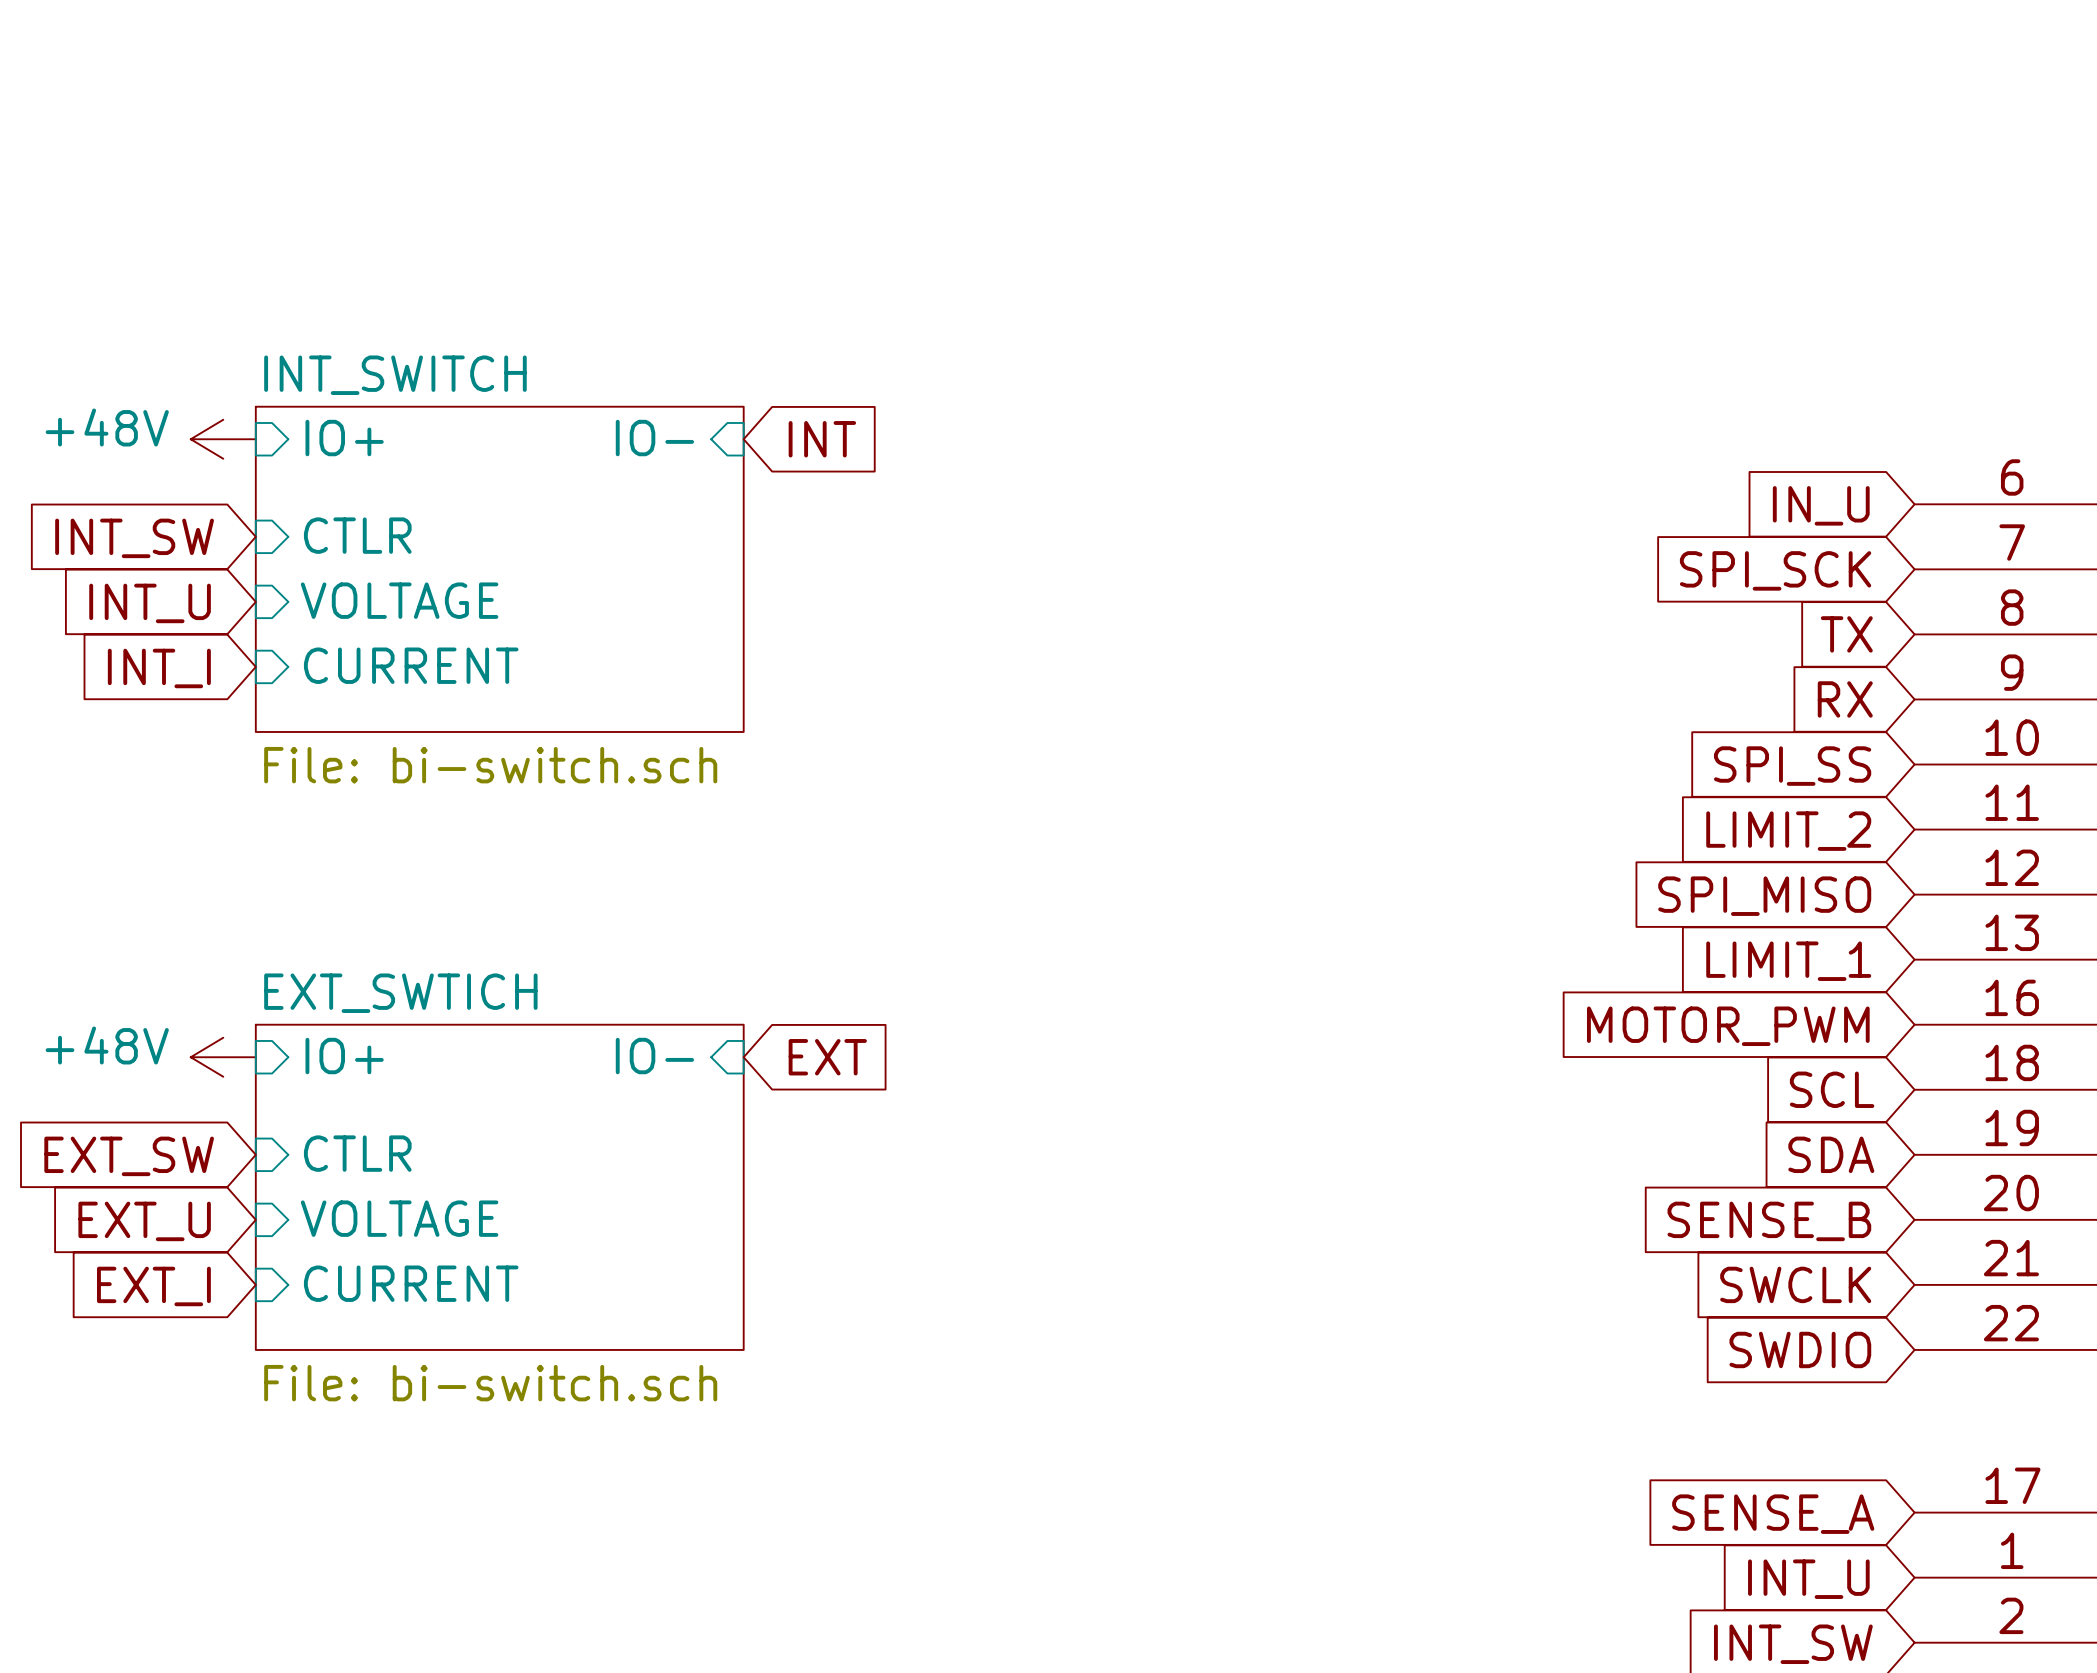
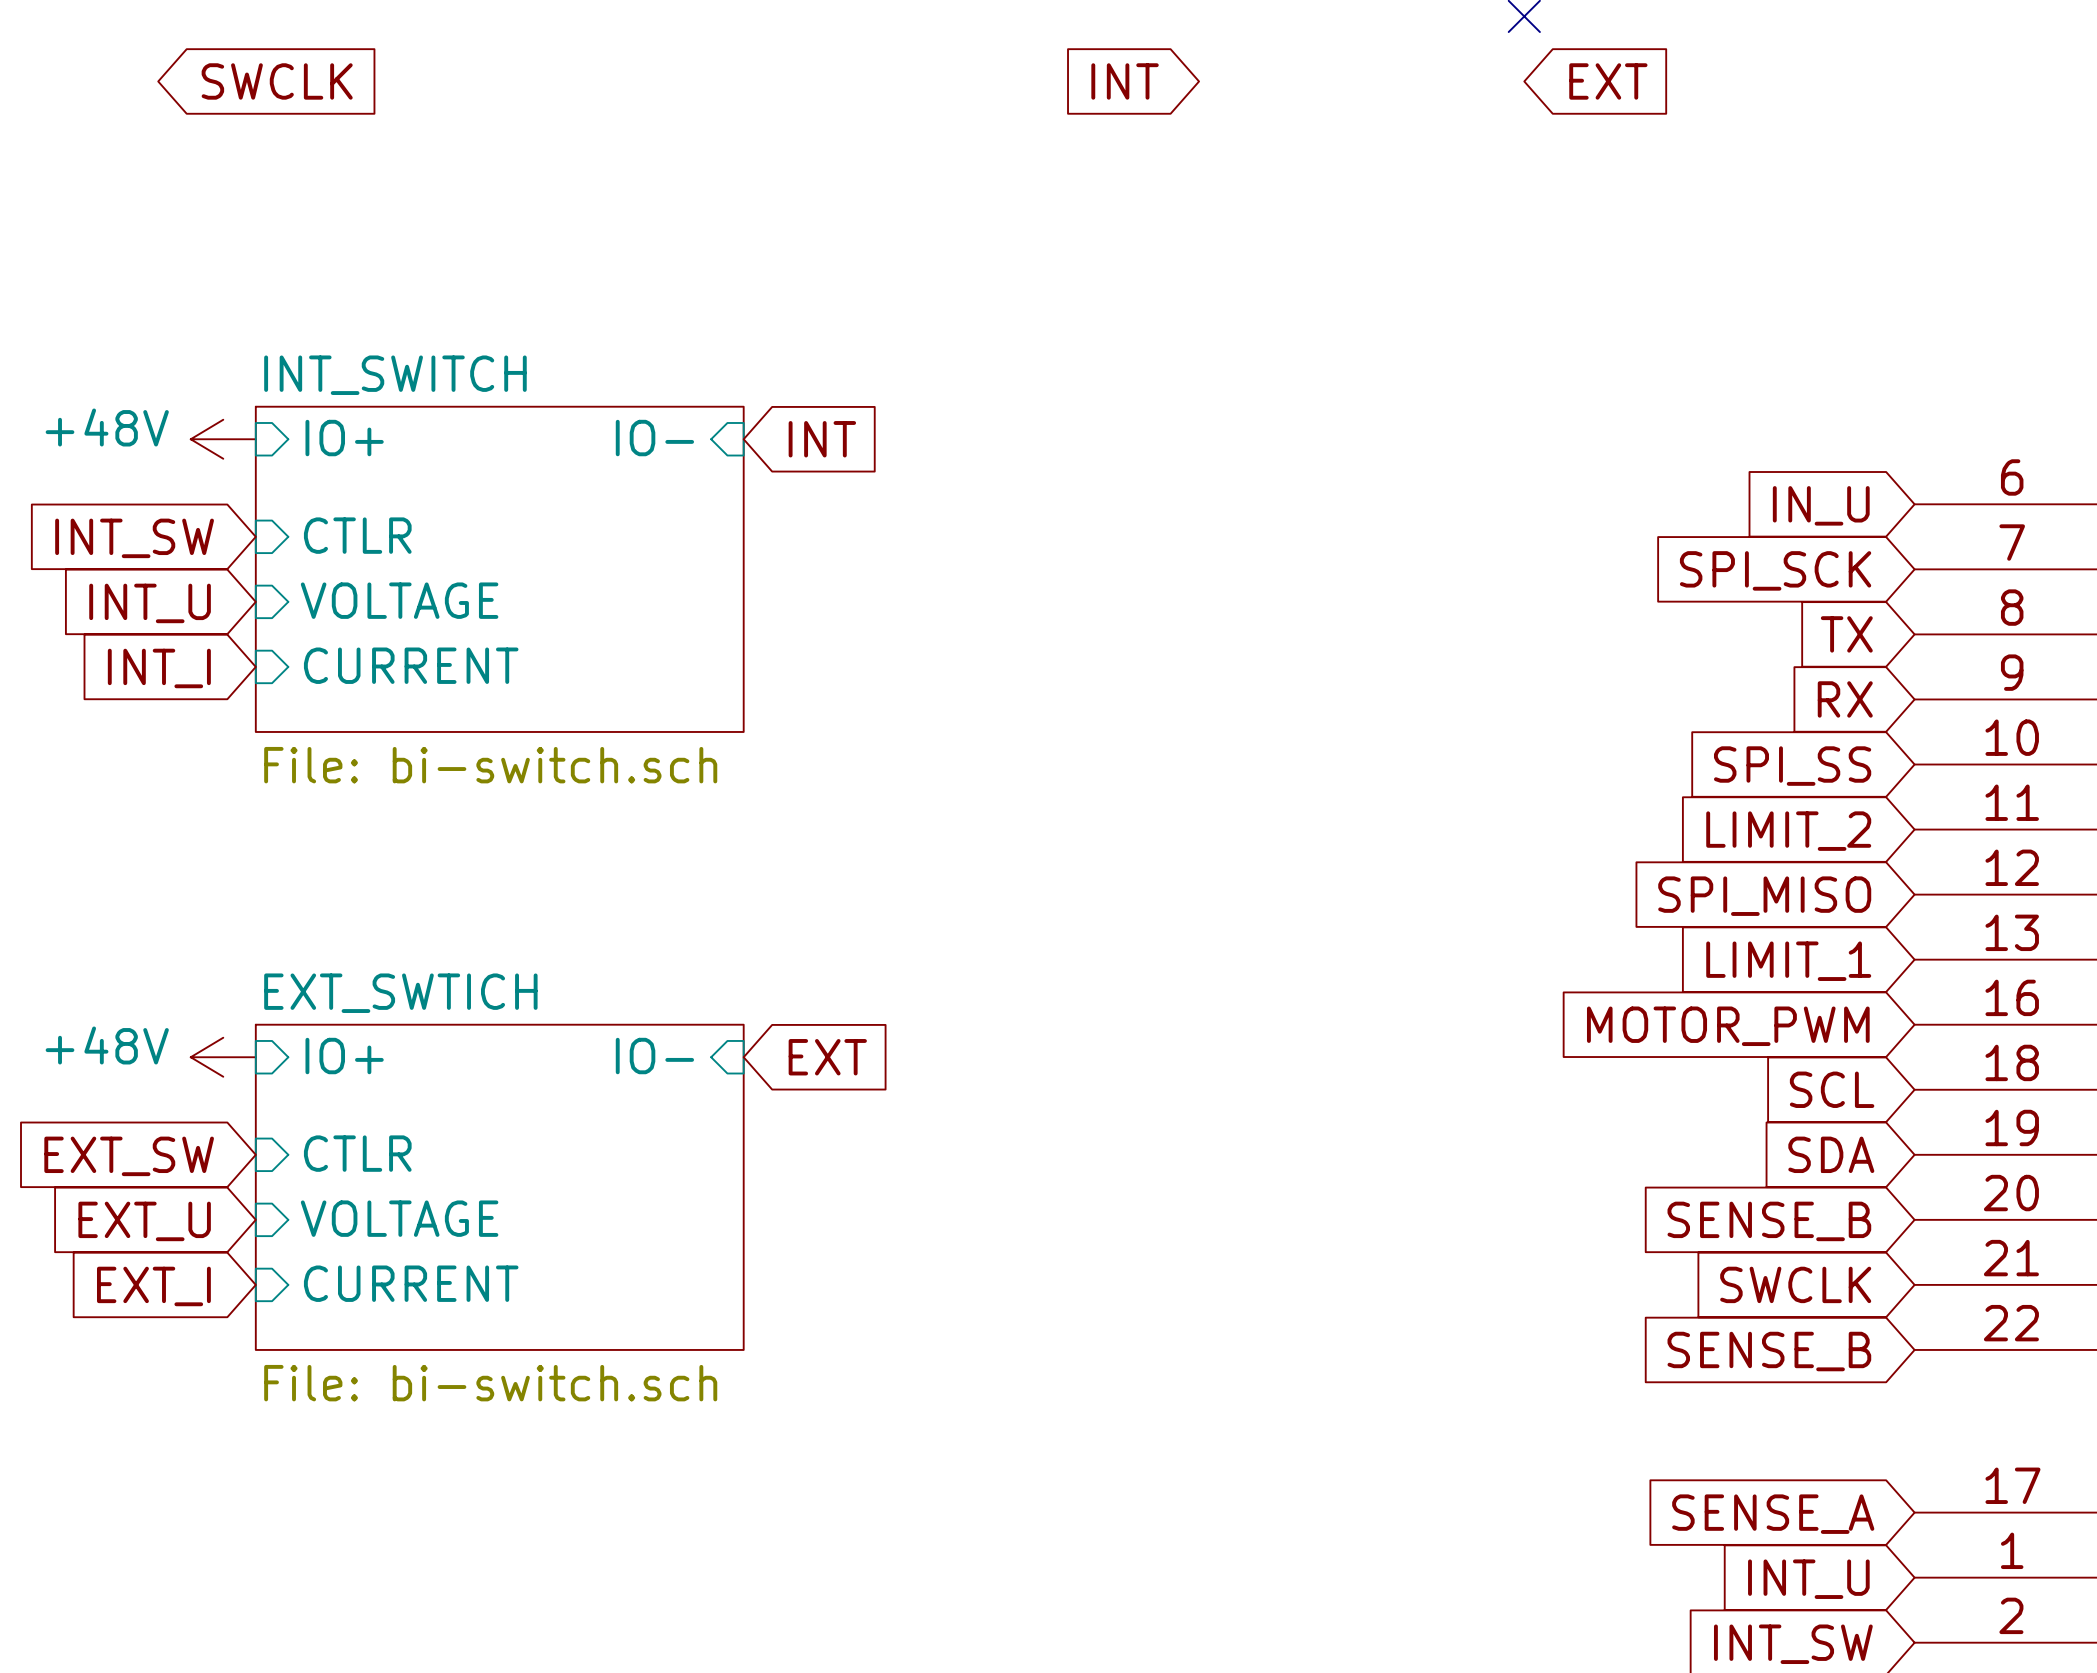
no-connect mark: none -> (1524, 16)
global label: none -> SWCLK (277, 81)
global label: none -> INT (1125, 81)
global label: none -> EXT (1608, 81)
global label: SWDIO (1800, 1349) -> SENSE_B (1769, 1351)

